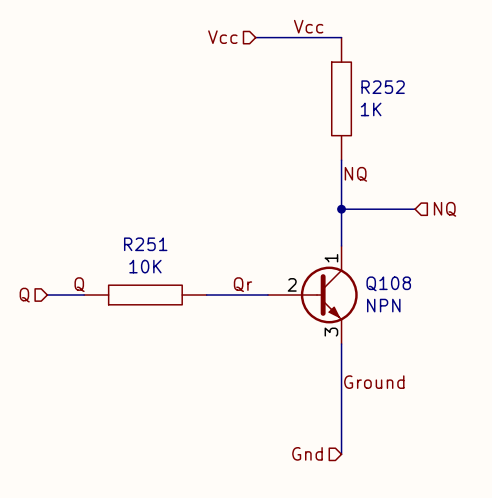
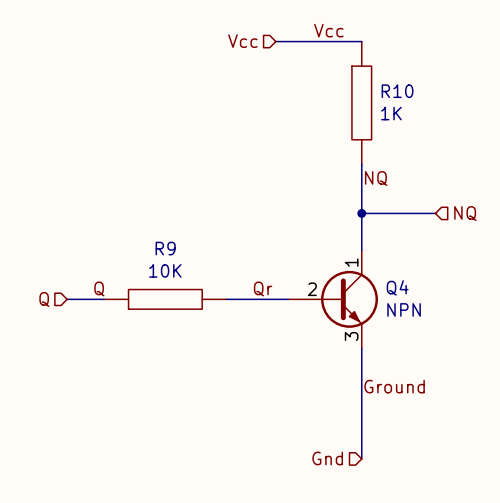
R252 name: R252 (383, 87) -> R10 (397, 91)
R251 name: R251 (145, 244) -> R9 (165, 248)
Q108 name: Q108 (388, 283) -> Q4 (397, 287)

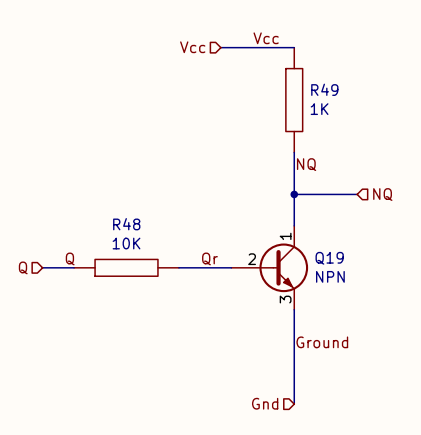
R10 name: R10 (397, 91) -> R49 (324, 89)
R9 name: R9 (165, 248) -> R48 (126, 224)
Q4 name: Q4 (397, 287) -> Q19 (329, 258)

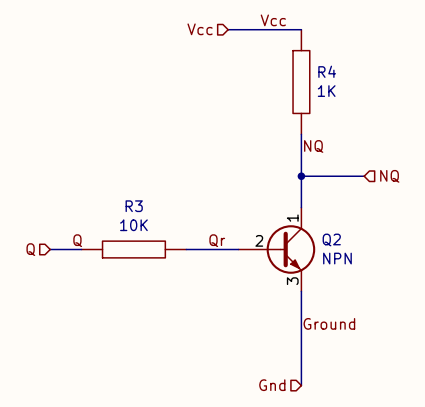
R49 name: R49 (324, 89) -> R4 (327, 71)
R48 name: R48 (126, 224) -> R3 (134, 206)
Q19 name: Q19 (329, 258) -> Q2 (331, 239)

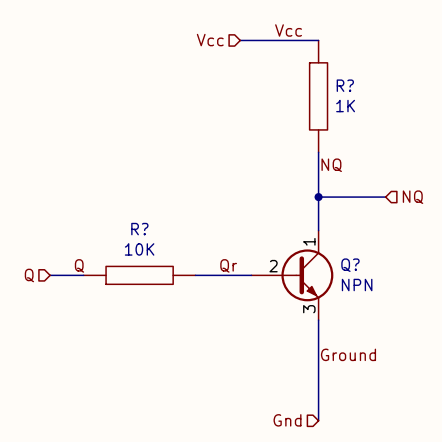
R4 name: R4 (327, 71) -> R? (345, 85)
R3 name: R3 (134, 206) -> R? (139, 229)
Q2 name: Q2 (331, 239) -> Q? (350, 265)

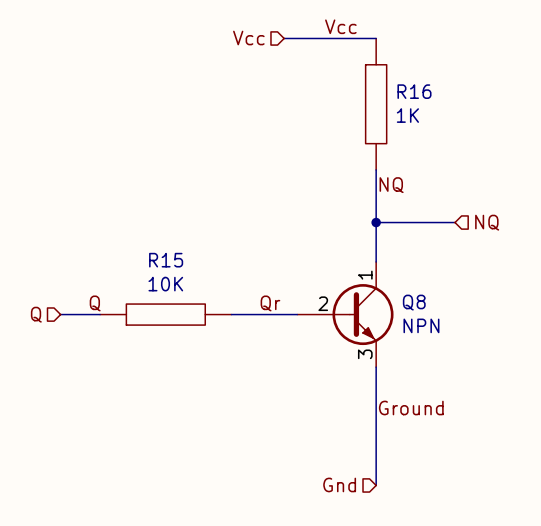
R? name: R? (345, 85) -> R16 (414, 91)
R? name: R? (139, 229) -> R15 (166, 260)
Q? name: Q? (350, 265) -> Q8 (414, 302)

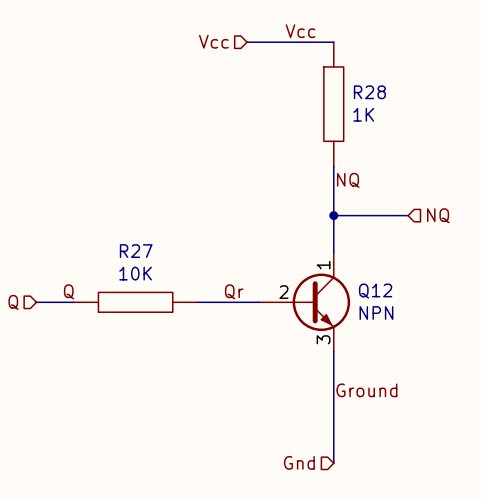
R16 name: R16 (414, 91) -> R28 (369, 92)
R15 name: R15 (166, 260) -> R27 (136, 251)
Q8 name: Q8 (414, 302) -> Q12 (375, 291)

